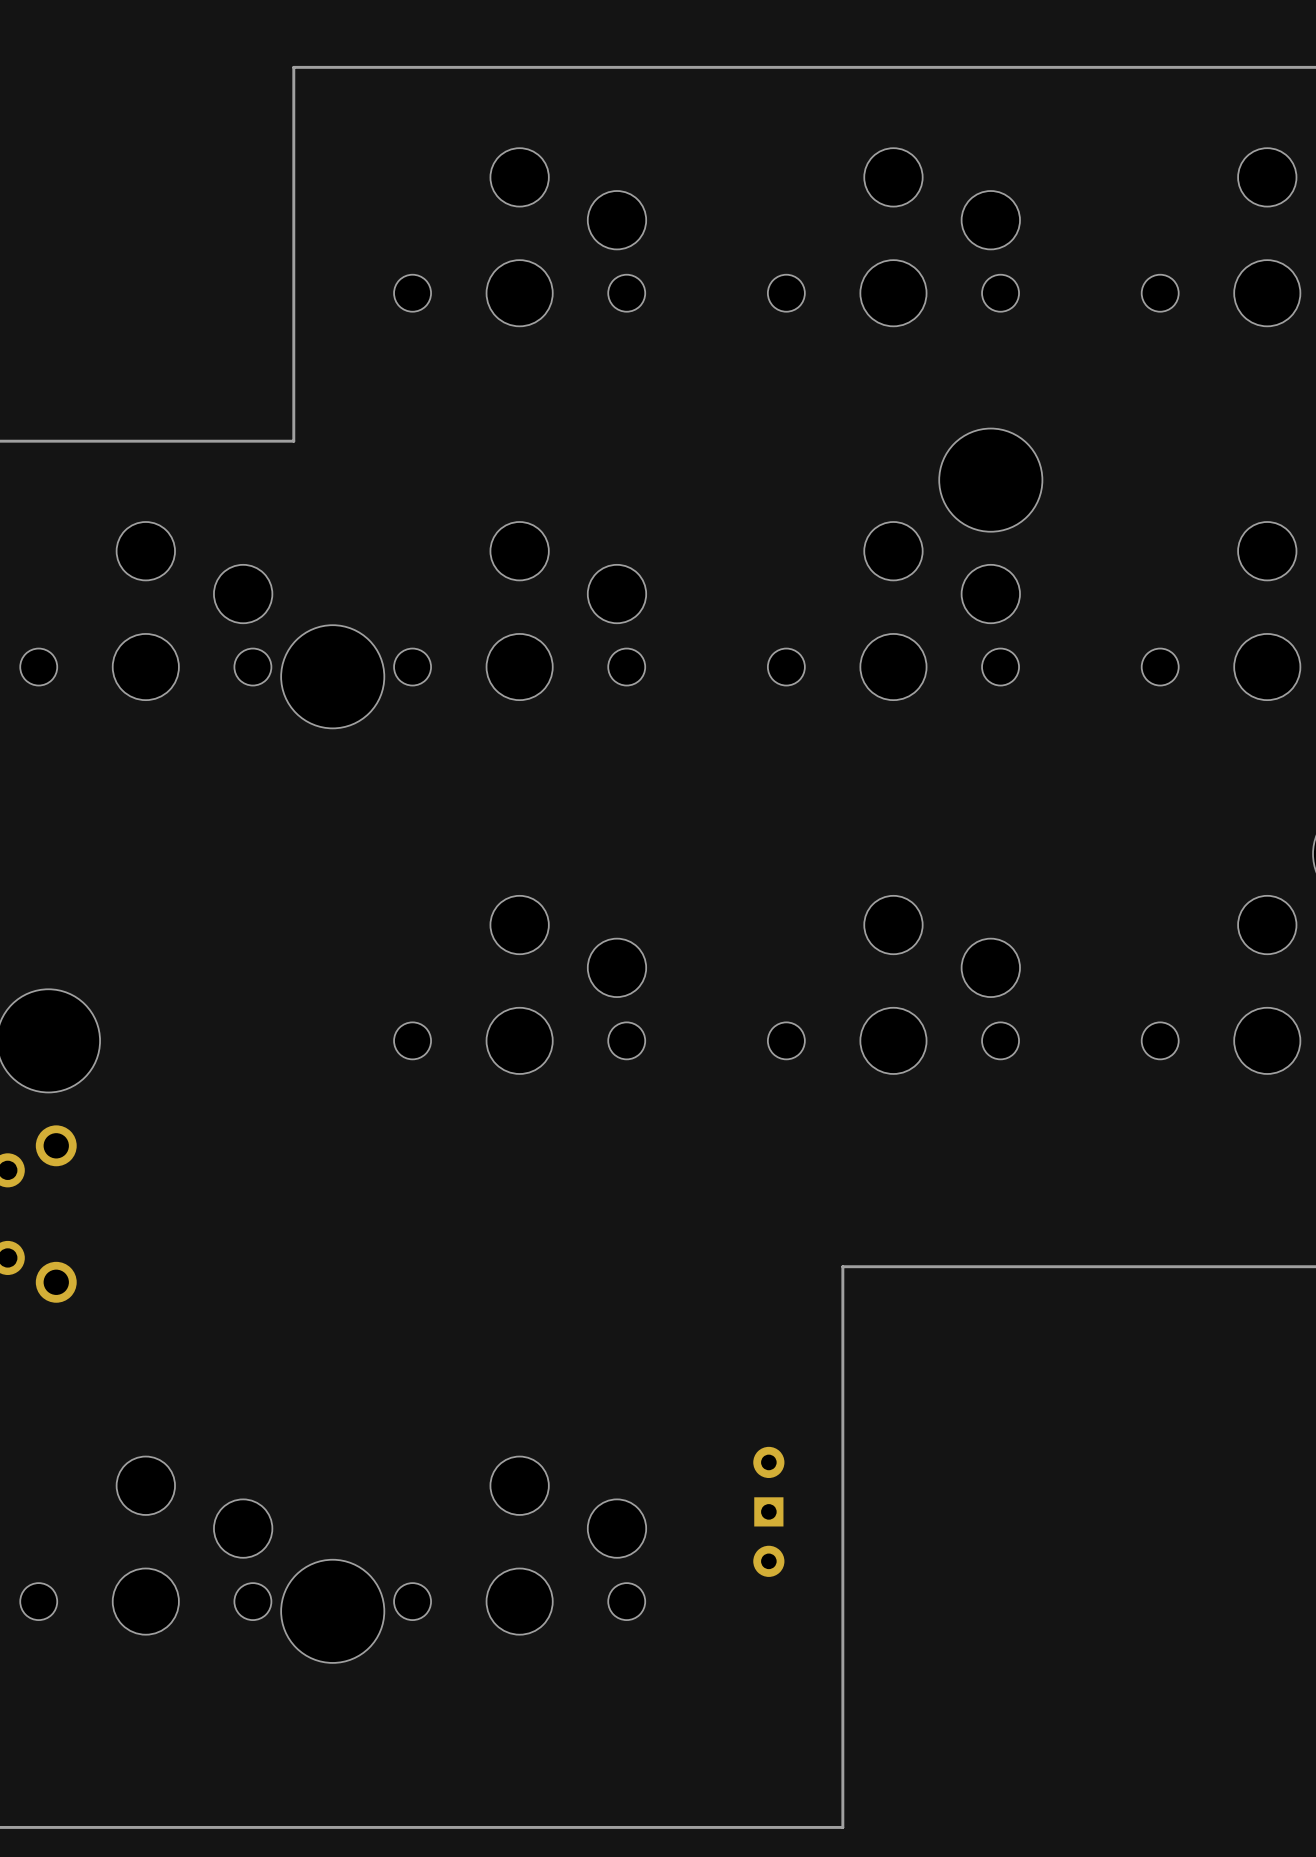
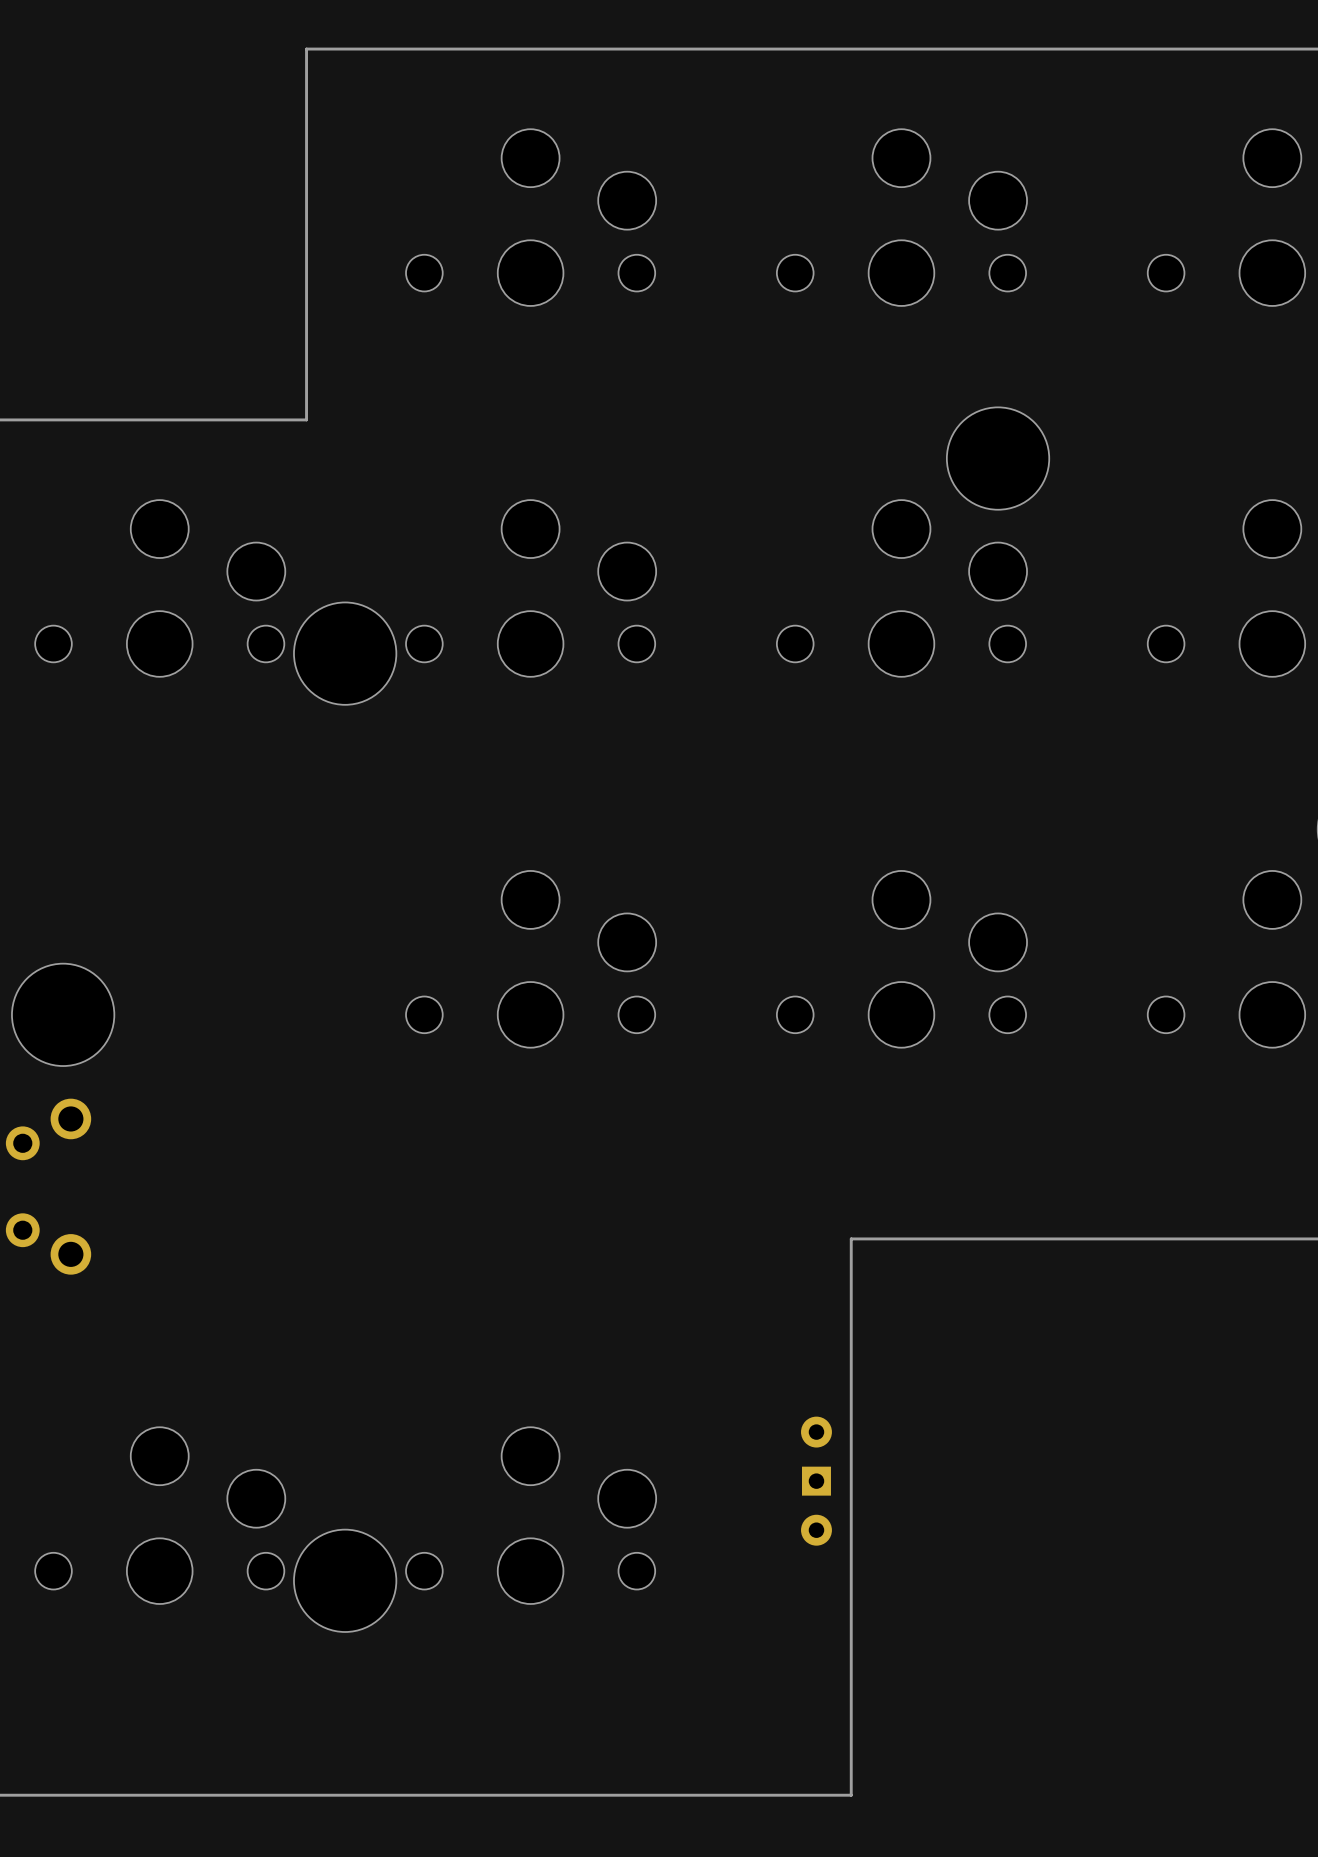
part position: (768, 1511) -> (816, 1481)

